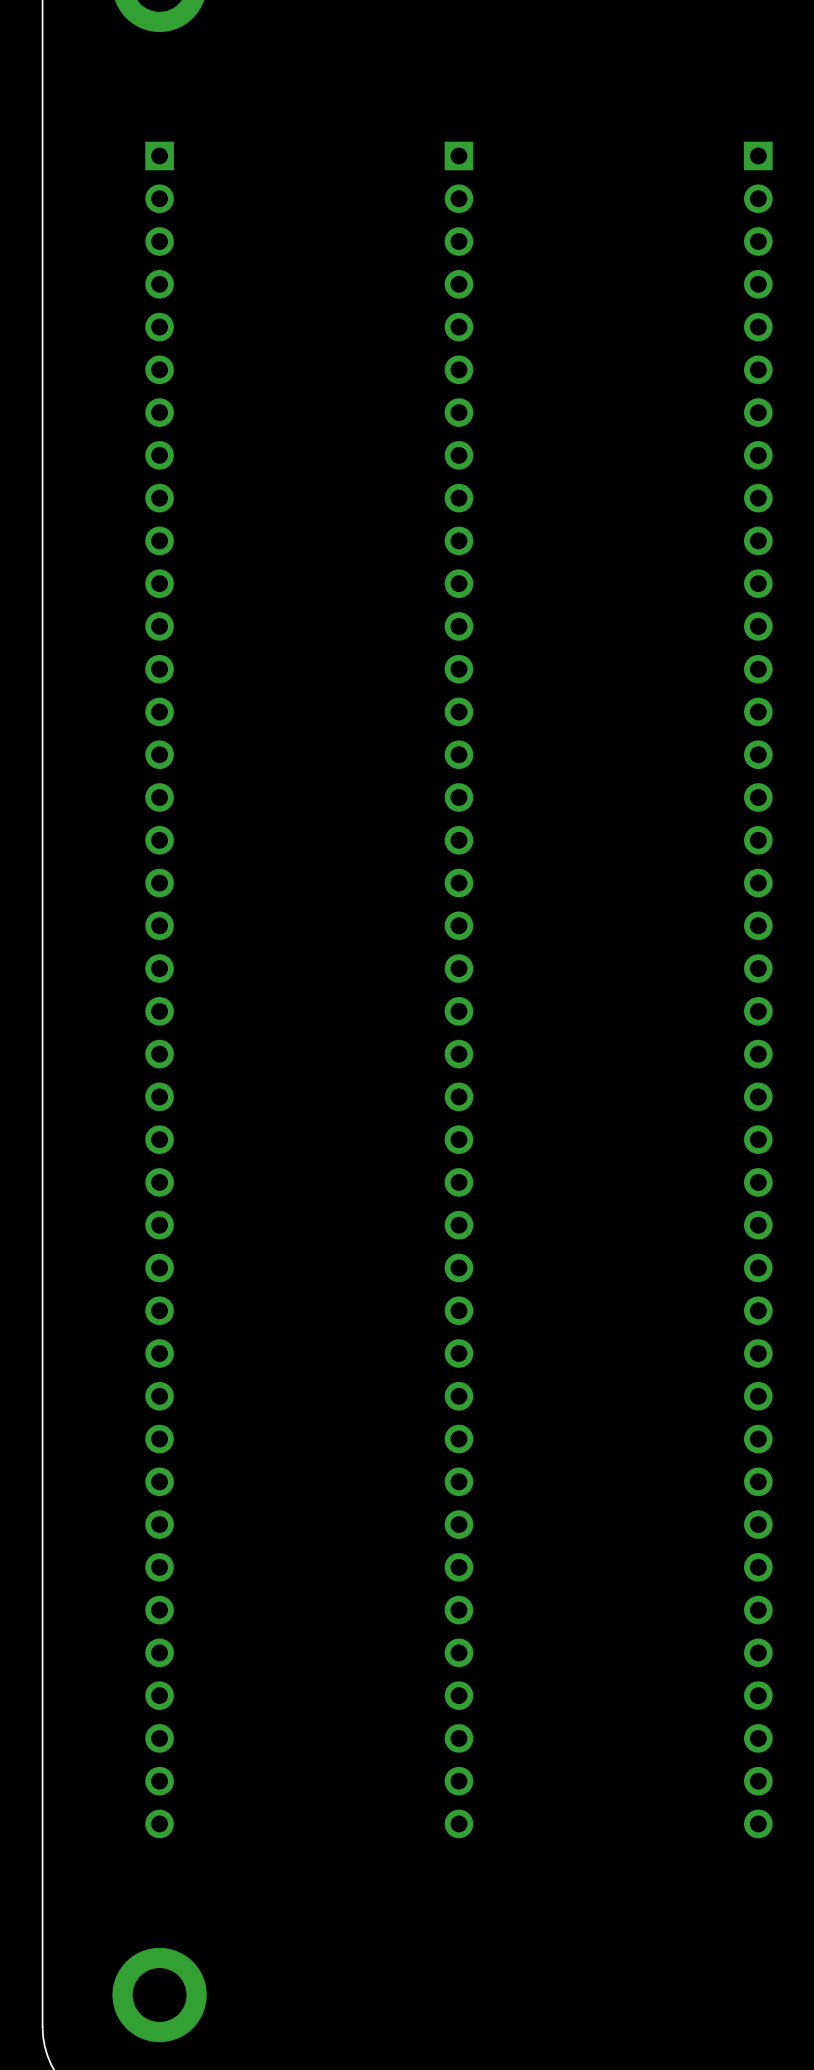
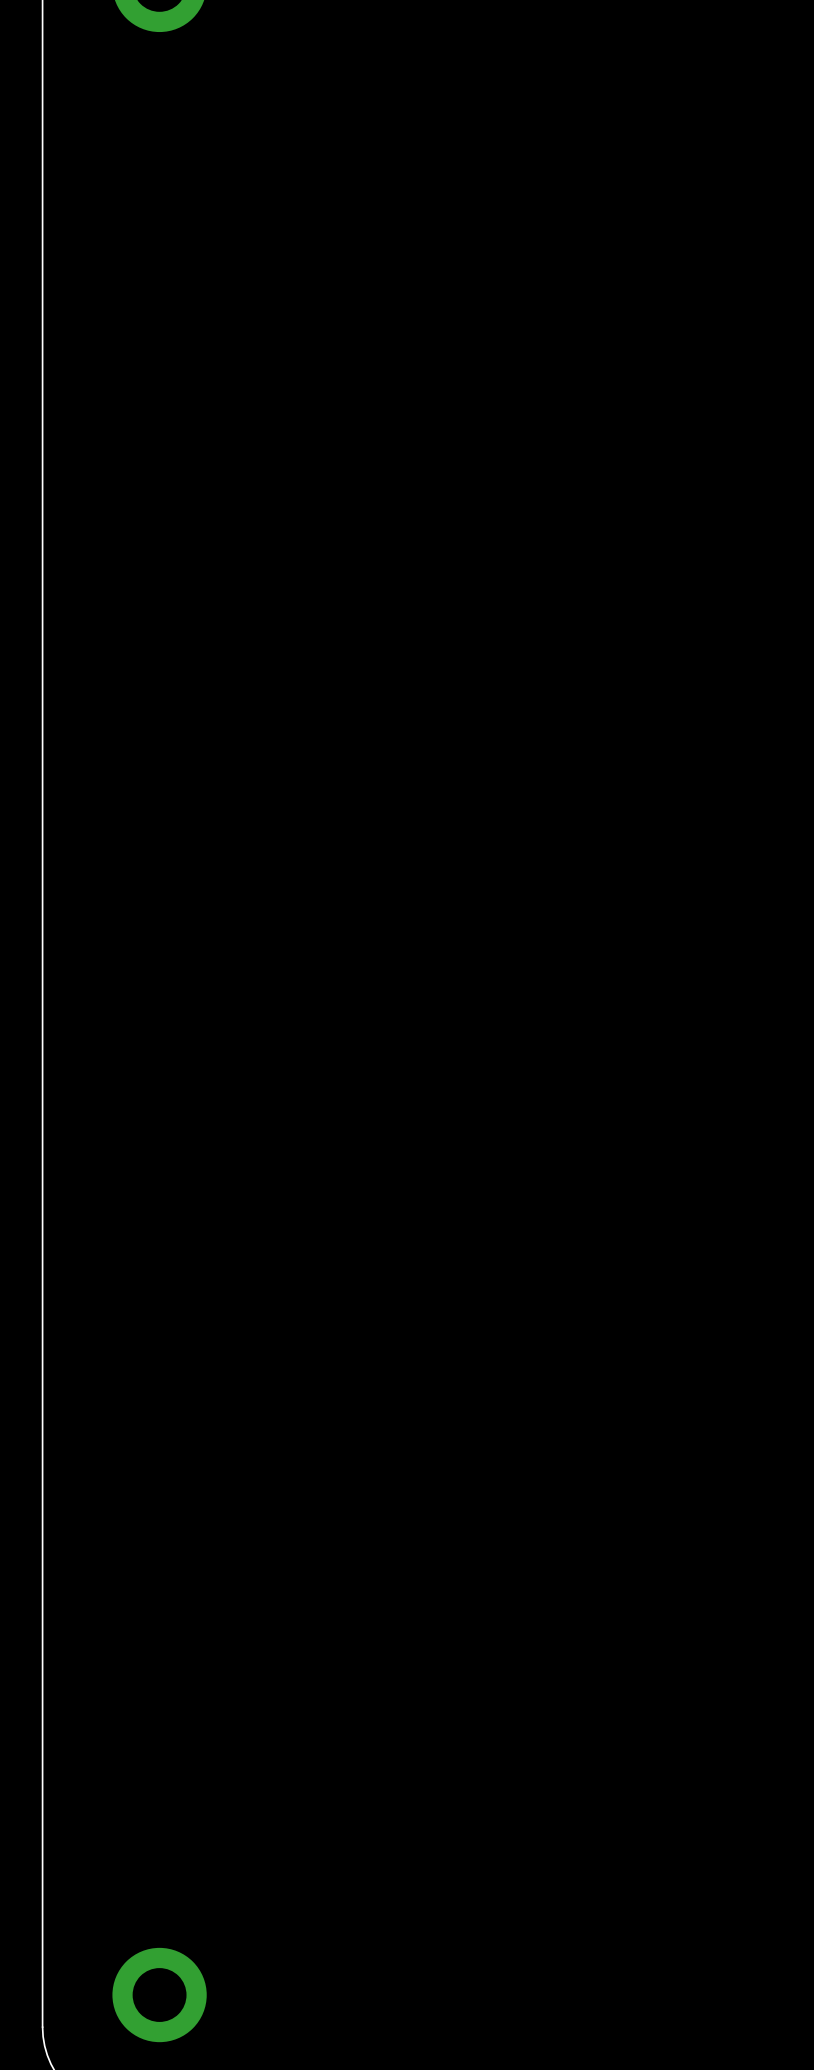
part: (159, 989) -> none
part: (458, 989) -> none
part: (758, 989) -> none

